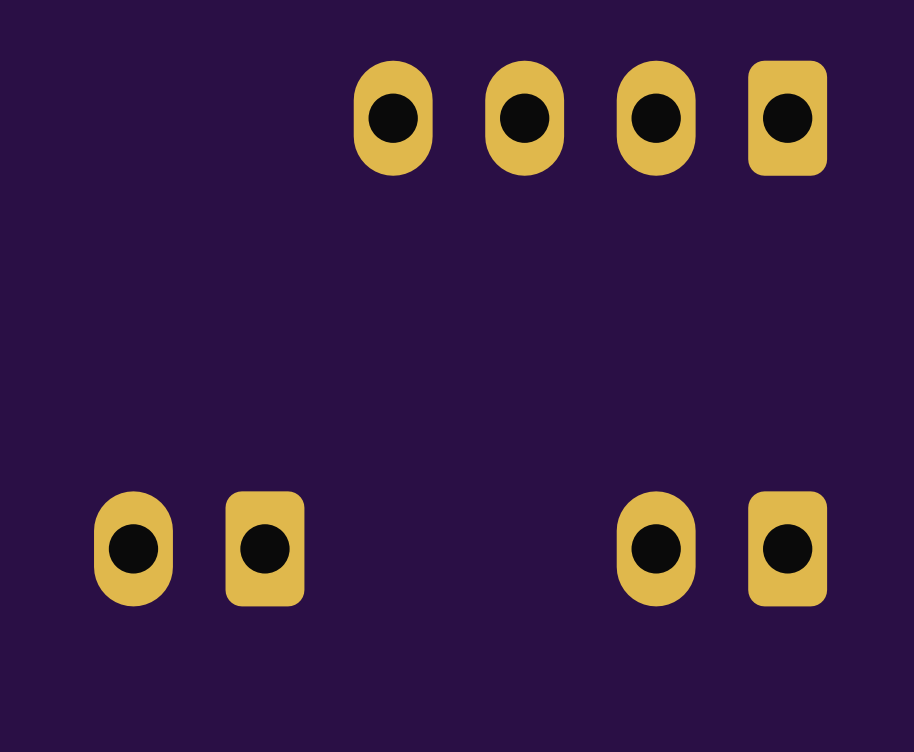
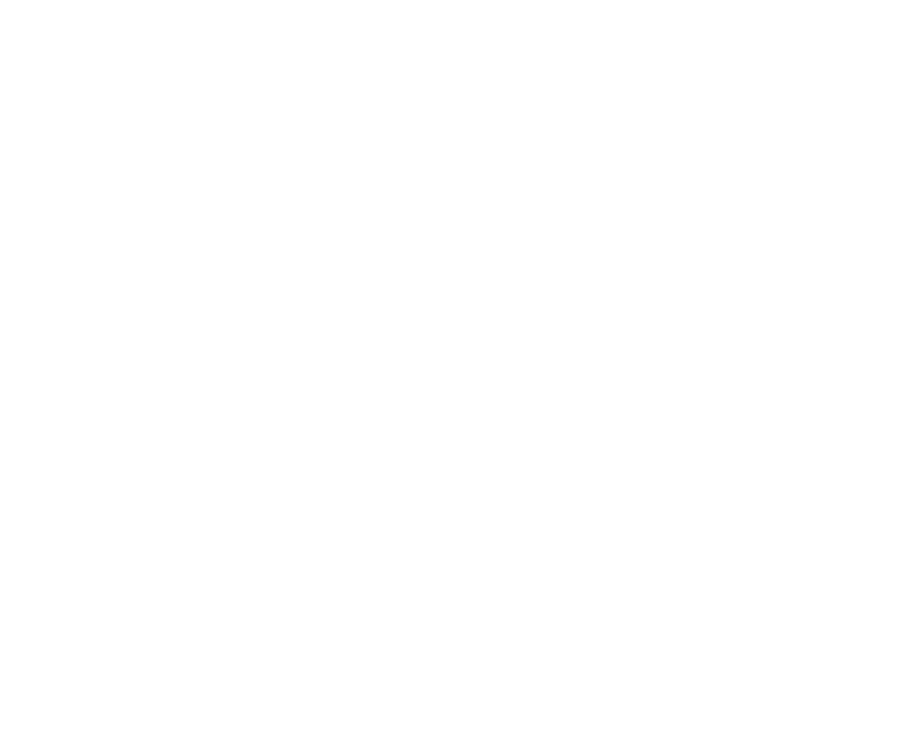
part: (590, 118) -> none
part: (199, 548) -> none
part: (721, 548) -> none

